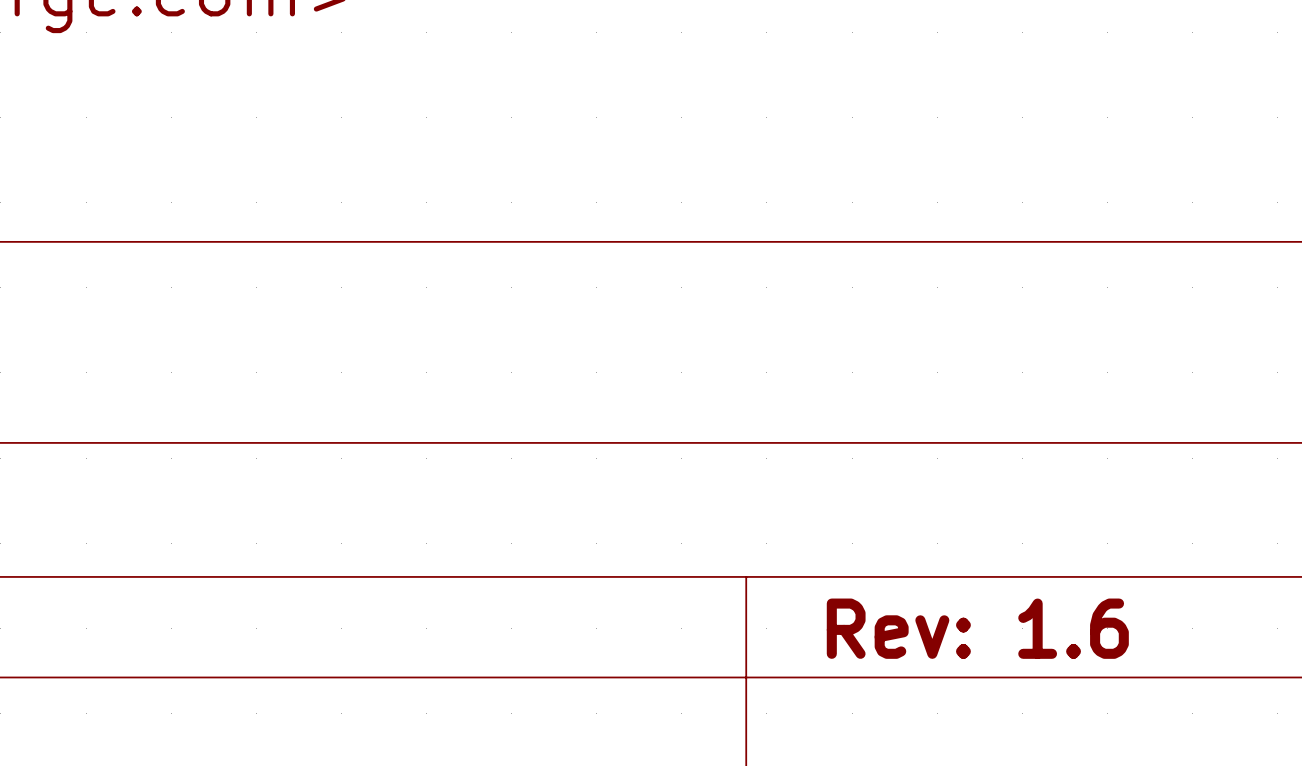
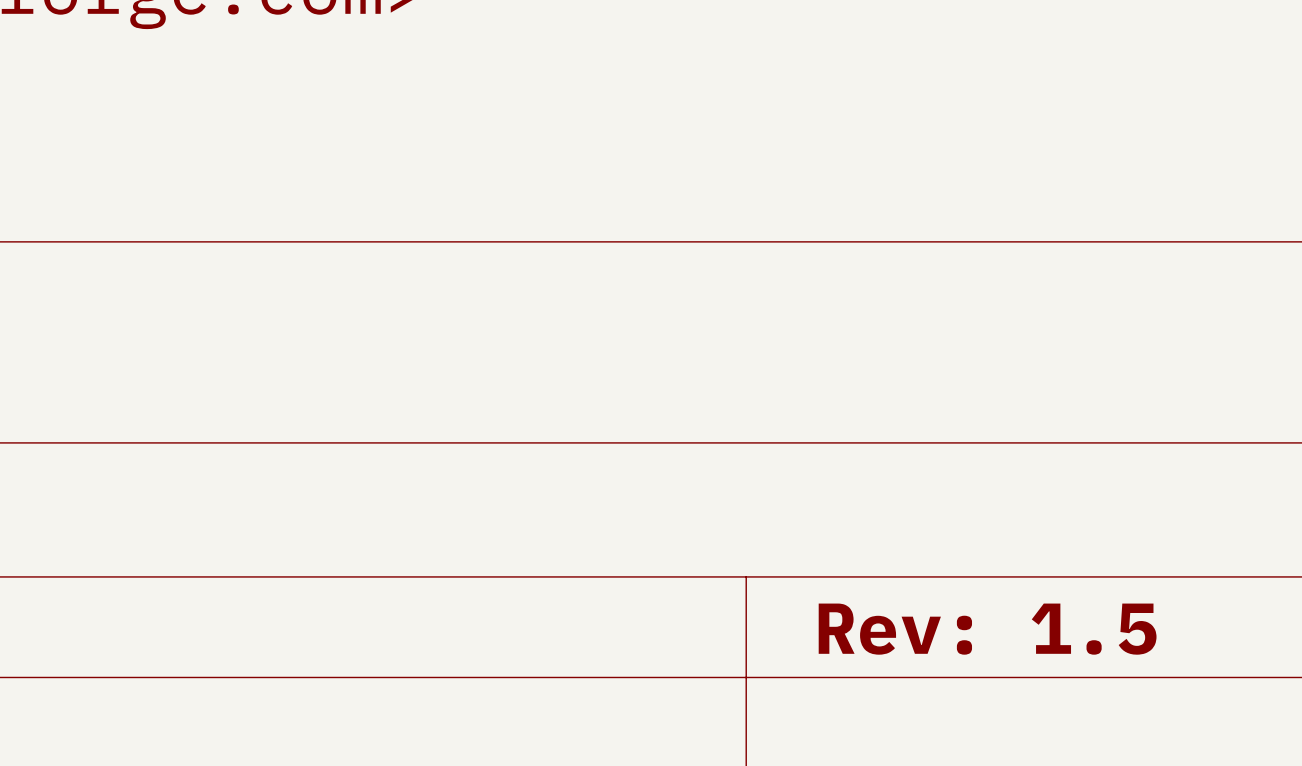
title block: Rev: 1.6 (977, 628) -> Rev: 1.5 (987, 629)

